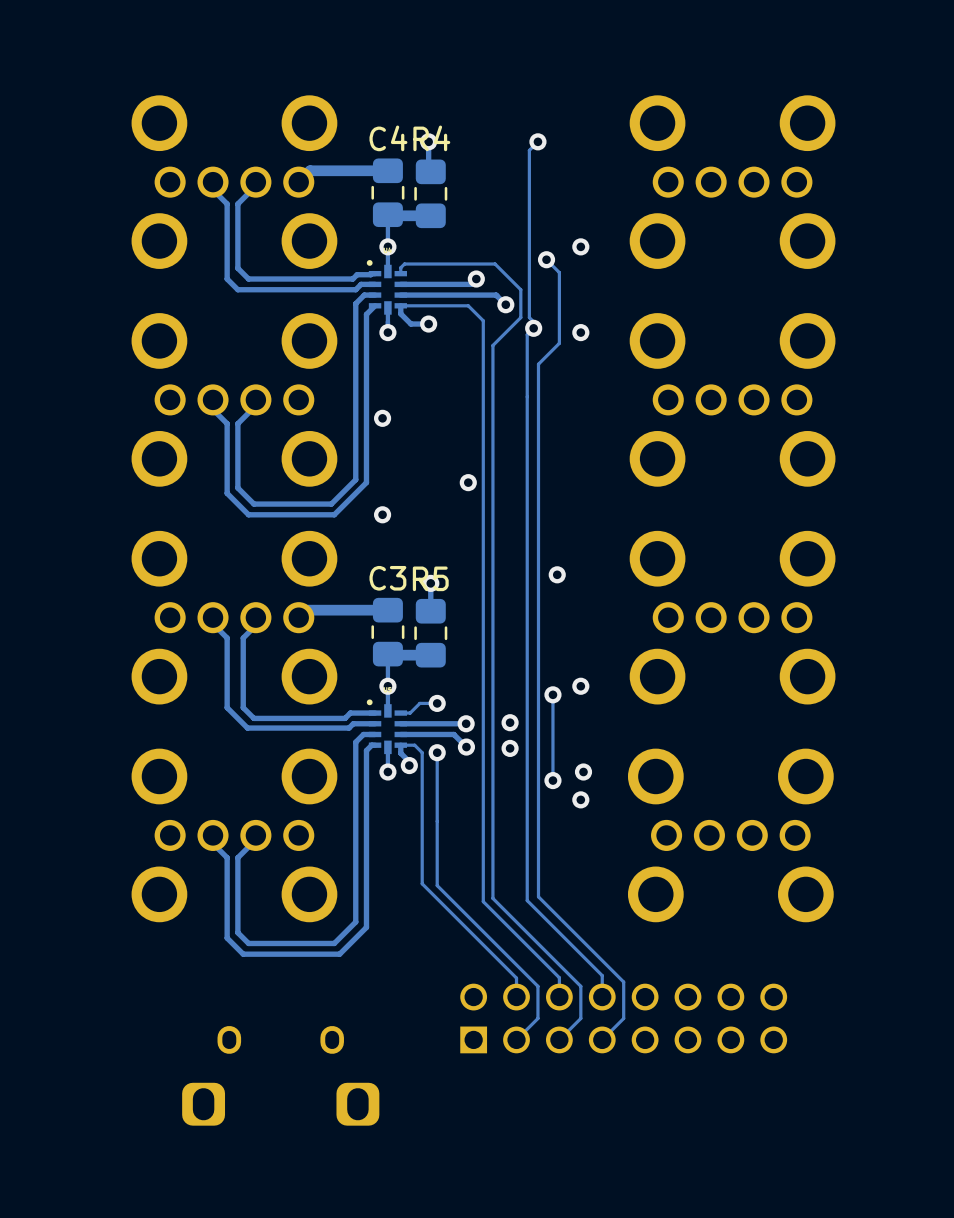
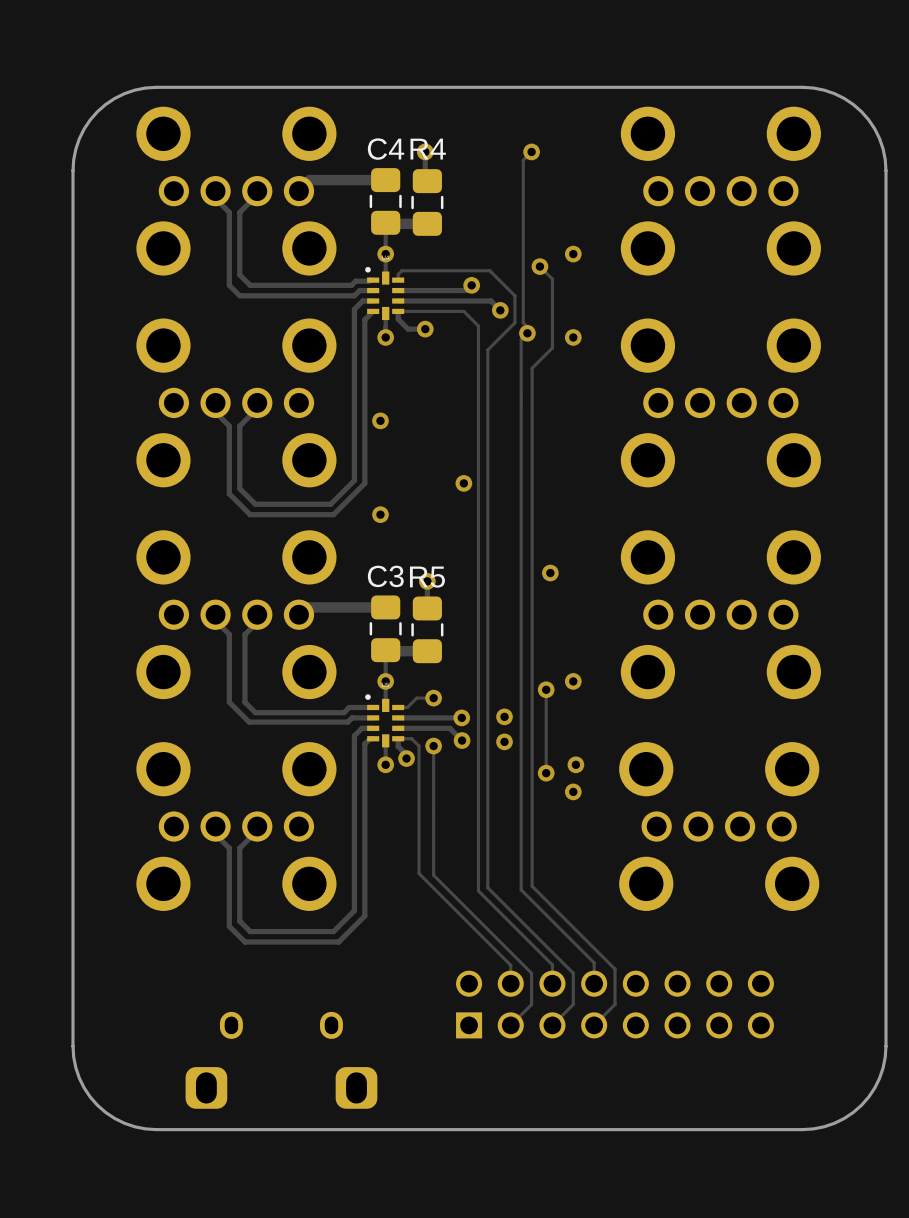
board edge: none -> (802, 87) (156, 87) (124, 93) (105, 104) (90, 119) (79, 138) (72, 170) (72, 1046) (75, 1067) (84, 1087) (105, 1112) (124, 1123) (156, 1129) (802, 1129) (824, 1126) (844, 1118) (868, 1096) (883, 1067) (885, 1046) (885, 170) (879, 138) (861, 111) (834, 93) (802, 87)

